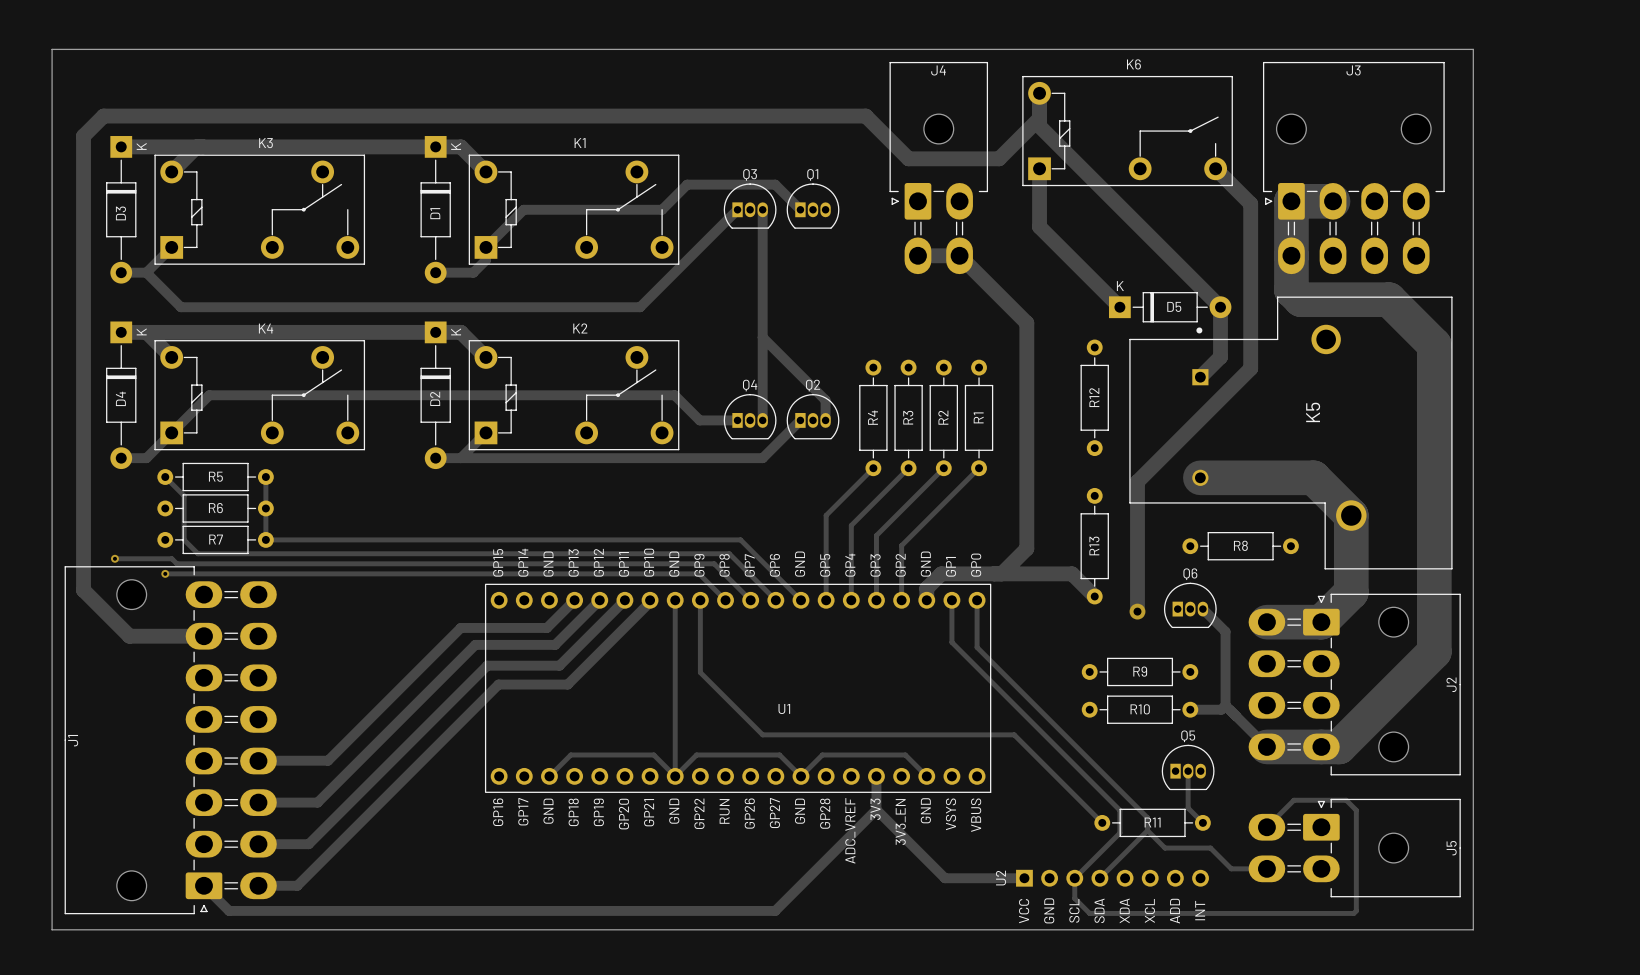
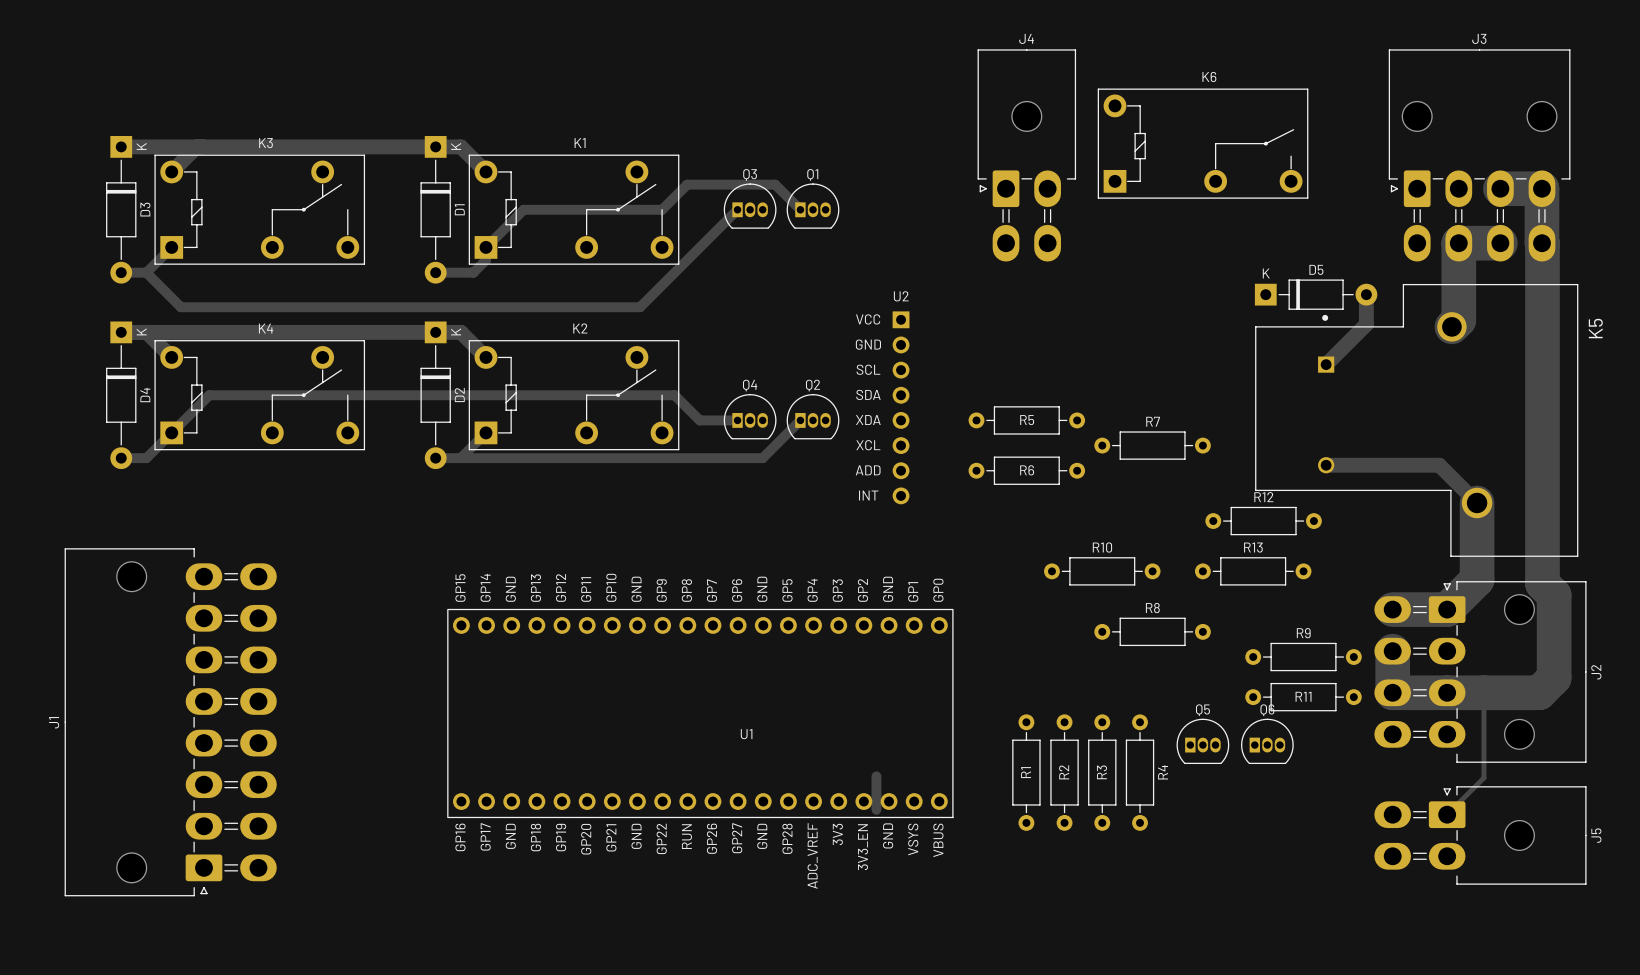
board edge: (52, 49) (1473, 49) (1473, 929) (52, 929) (52, 49) -> none
J4 name position: J4 (938, 70) -> J4 (1026, 38)
J3 name position: J3 (1353, 70) -> J3 (1479, 38)
track: (1039, 93) (1039, 126) (1220, 307) (1220, 357) (1200, 377) -> none
track: (1039, 118) (999, 158) (908, 158) (865, 116) (103, 116) (83, 136) (83, 590) (129, 636) (203, 636) -> none
K6 position: (1127, 131) -> (1203, 143)
J4 position: (938, 168) -> (1026, 155)
track: (1039, 168) (1039, 226) (1119, 307) -> none
track: (1215, 168) (1250, 203) (1250, 368) (1137, 481) (1137, 611) -> none
J3 position: (1353, 168) -> (1479, 155)
track: none -> (1500, 188) (1541, 188) (1542, 583) (1554, 595) (1554, 677) (1539, 692) (1392, 692) (1392, 651)
track: (1333, 201) (1291, 201) (1291, 290) (1301, 299) (1389, 299) (1434, 344) (1434, 651) (1339, 746) (1266, 746) (1225, 705) -> none
track: (762, 209) (762, 420) -> none
D3 name position: D3 (120, 213) -> D3 (145, 209)
D1 name position: D1 (435, 213) -> D1 (459, 209)
track: none -> (1500, 243) (1458, 243) (1458, 320) (1451, 326)
track: (917, 255) (959, 255) (1026, 323) (1026, 548) (1001, 573) -> none
track: none -> (1366, 294) (1366, 324) (1326, 364)
D5 name position: D5 (1174, 306) -> D5 (1316, 269)
D5 position: (1170, 307) -> (1316, 294)
track: (762, 337) (825, 400) (825, 420) -> none
R12 rotation: 0° (1094, 397) -> 90° clockwise (1263, 521)
R12 position: (1094, 397) -> (1263, 521)
R12 name position: R12 (1094, 397) -> R12 (1263, 497)
D4 name position: D4 (120, 398) -> D4 (145, 395)
D2 name position: D2 (435, 398) -> D2 (459, 395)
K5 name position: K5 (1313, 412) -> K5 (1595, 328)
R4 position: (873, 417) -> (1140, 772)
R4 name position: R4 (873, 417) -> R4 (1163, 772)
R3 position: (908, 417) -> (1102, 772)
R2 position: (943, 417) -> (1064, 772)
R1 position: (979, 417) -> (1026, 772)
K5 position: (1290, 433) -> (1416, 420)
track: (873, 468) (826, 515) (826, 600) -> none
track: (908, 468) (851, 525) (851, 600) -> none
track: (943, 468) (876, 535) (876, 600) -> none
track: (979, 468) (901, 545) (901, 600) -> none
track: (165, 477) (184, 495) (184, 539) (197, 553) (729, 553) (775, 600) -> none
R5 position: (215, 477) -> (1026, 420)
track: (265, 477) (265, 539) (740, 539) (801, 600) -> none
track: (1200, 477) (1313, 477) (1351, 515) (1351, 592) (1321, 622) (1266, 622) -> (1326, 465) (1439, 465) (1477, 502) (1477, 579) (1447, 609) (1392, 609)
R6 position: (215, 508) -> (1026, 470)
R7 position: (215, 539) -> (1152, 445)
R7 name position: R7 (216, 539) -> R7 (1153, 421)
R13 name position: R13 (1094, 545) -> R13 (1253, 547)
R8 name position: R8 (1240, 545) -> R8 (1152, 608)
R13 rotation: 0° (1094, 546) -> 90° clockwise (1253, 571)
R13 position: (1094, 546) -> (1253, 571)
R8 position: (1240, 546) -> (1152, 631)
track: (114, 558) (171, 558) (176, 563) (714, 563) (750, 600) -> none
via: (114, 558) -> none
track: (165, 573) (699, 573) (725, 600) -> none
via: (165, 573) -> none
track: (1094, 596) (1072, 573) (941, 573) (926, 588) (926, 600) -> none
track: (574, 600) (546, 627) (460, 627) (328, 760) (258, 761) -> none
track: (599, 600) (555, 644) (475, 644) (317, 802) (258, 802) -> none
track: (624, 600) (559, 665) (487, 665) (308, 844) (258, 844) -> none
track: (650, 600) (567, 684) (498, 684) (297, 885) (258, 885) -> none
track: (675, 600) (675, 776) -> none
track: (700, 600) (700, 672) (762, 734) (1014, 734) (1102, 822) -> none
track: (951, 600) (951, 642) (1119, 810) (1119, 833) (1074, 878) (1074, 898) (1089, 913) (1353, 913) (1356, 910) (1356, 810) (1346, 800) (1293, 800) (1266, 827) -> none
track: (977, 600) (977, 647) (1147, 817) (1147, 830) -> none
Q6 position: (1190, 605) -> (1267, 741)
track: (1202, 609) (1225, 631) (1225, 705) -> none
via: (1137, 611) -> none
R9 position: (1140, 671) -> (1303, 657)
R9 name position: R9 (1140, 671) -> R9 (1303, 633)
J2 position: (1354, 684) -> (1480, 671)
J2 name position: J2 (1451, 684) -> J2 (1596, 672)
U1 position: (738, 688) -> (700, 713)
track: none -> (1483, 692) (1483, 777) (1447, 814)
track: (1225, 705) (1221, 709) (1190, 709) -> none
R10 position: (1140, 709) -> (1102, 571)
R10 name position: R10 (1140, 709) -> R10 (1102, 547)
J1 name position: J1 (73, 740) -> J1 (54, 722)
J1 position: (170, 740) -> (170, 722)
Q5 position: (1188, 767) -> (1202, 741)
track: (1188, 771) (1188, 808) (1202, 822) -> none
track: (549, 776) (570, 754) (653, 754) (675, 776) -> none
track: (675, 776) (696, 754) (779, 754) (801, 776) (822, 754) (905, 754) (926, 776) -> none
R11 position: (1152, 822) -> (1303, 697)
track: (1147, 830) (1165, 848) (1210, 848) (1231, 868) (1266, 868) -> none
track: (1147, 830) (1099, 878) -> none
J5 position: (1354, 848) -> (1480, 835)
J5 name position: J5 (1451, 848) -> J5 (1596, 835)
track: (1024, 878) (944, 878) (876, 809) (775, 910) (229, 910) (203, 885) -> none
U2 rotation: 0° (1112, 878) -> 90° clockwise (901, 407)
U2 position: (1112, 878) -> (901, 407)

